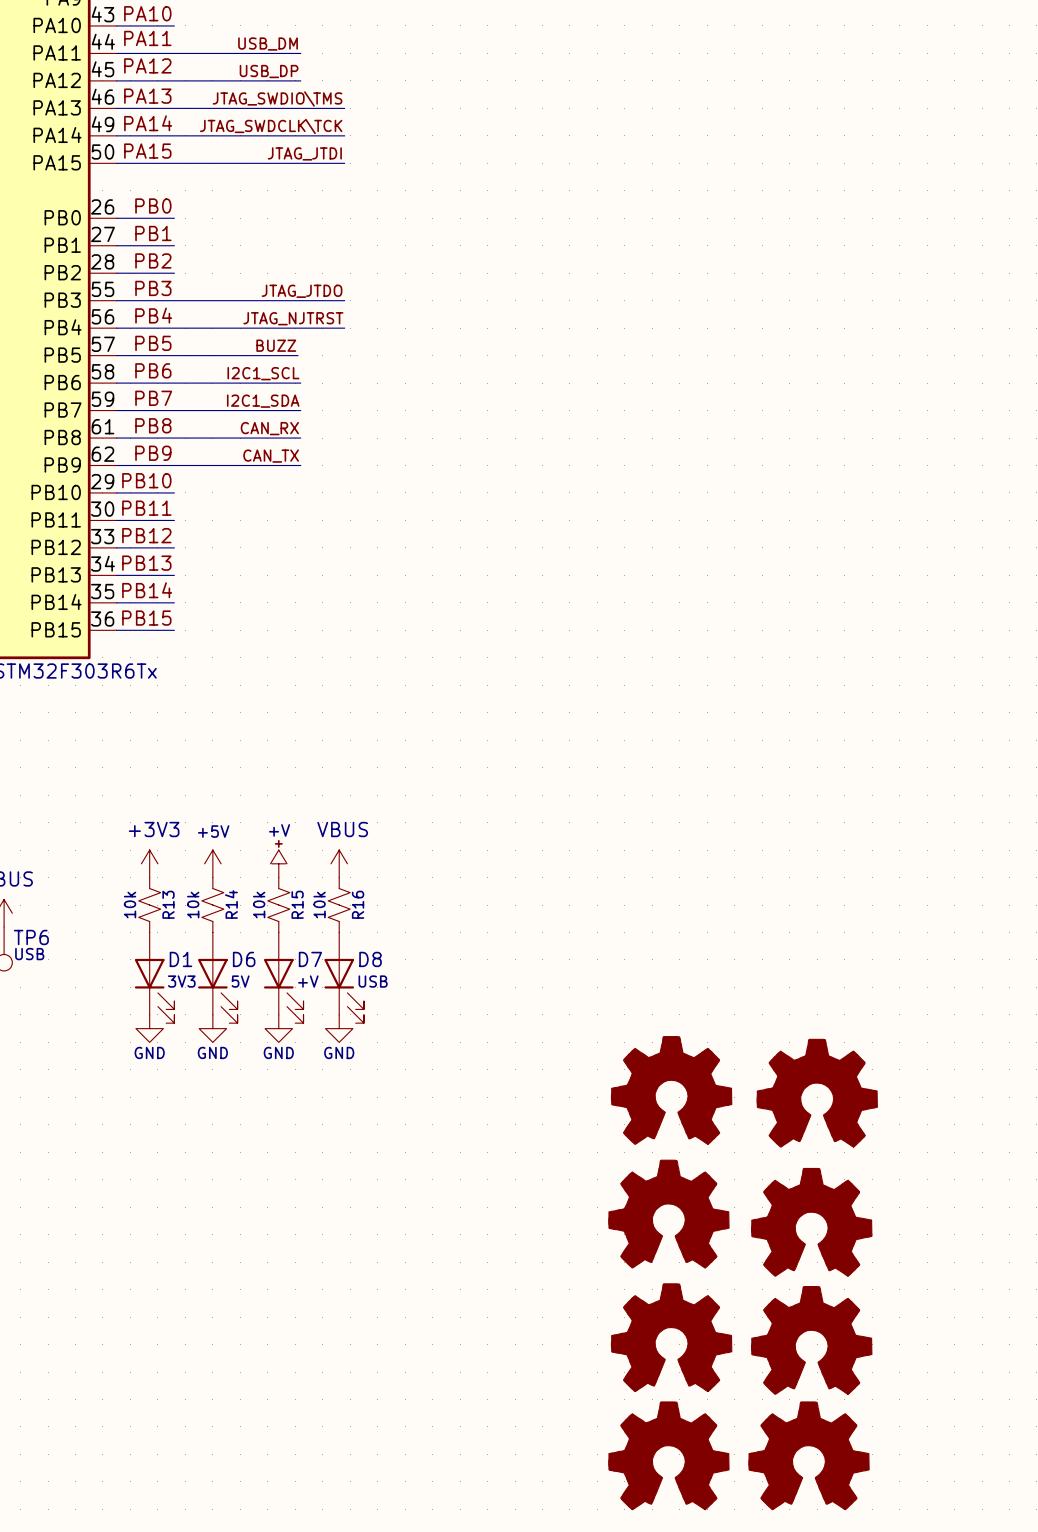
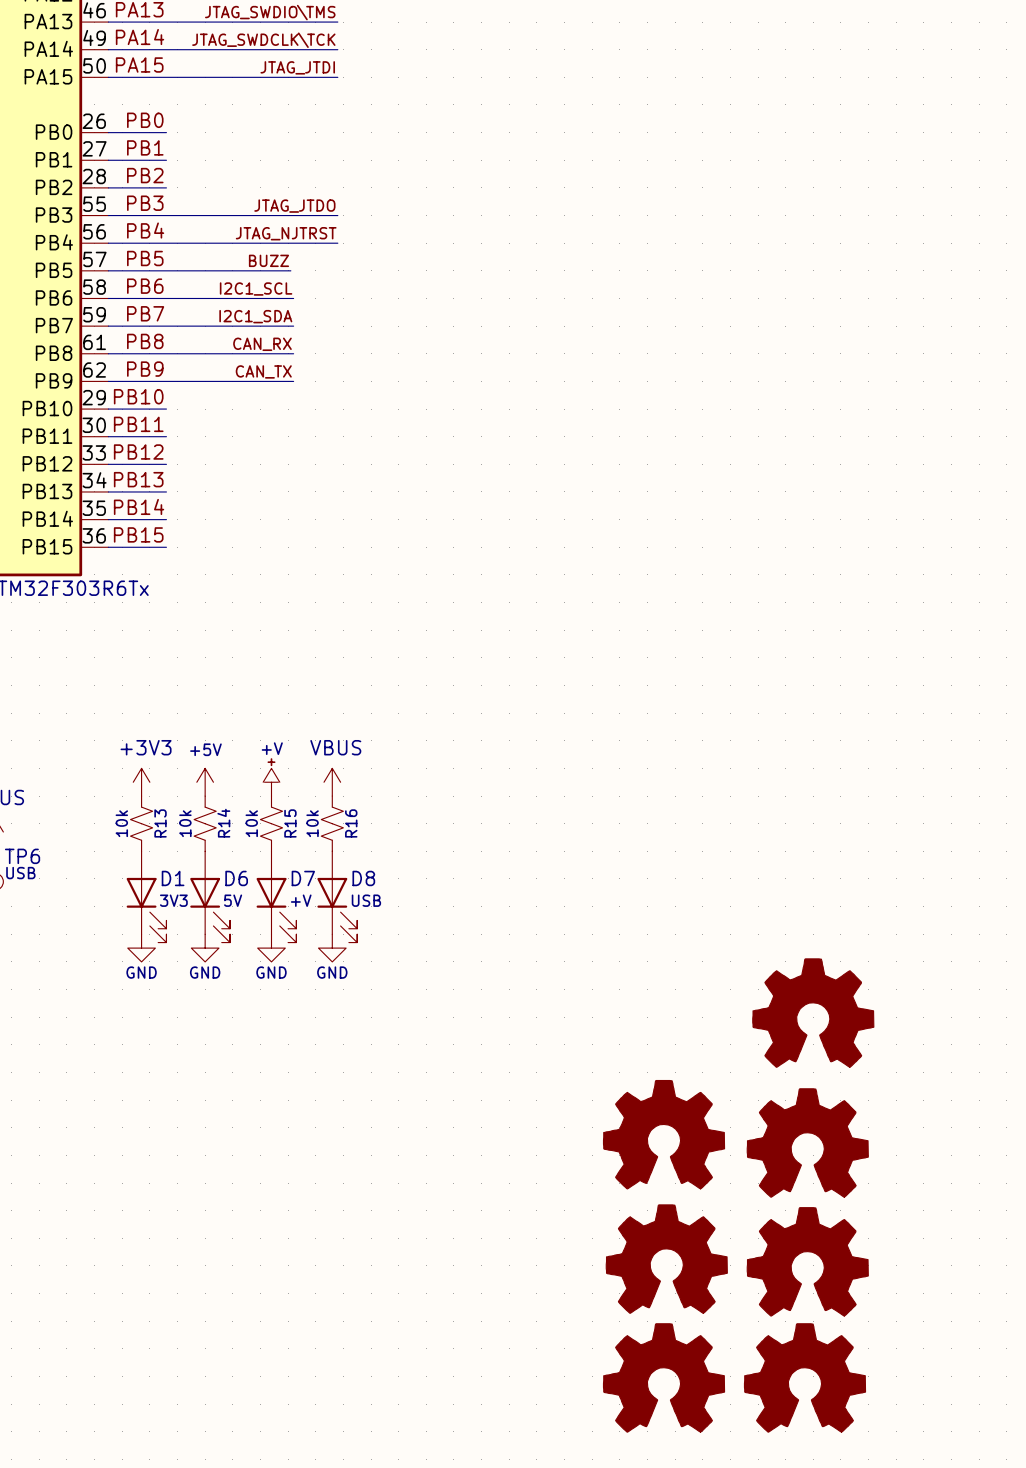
part: (671, 1090) -> none

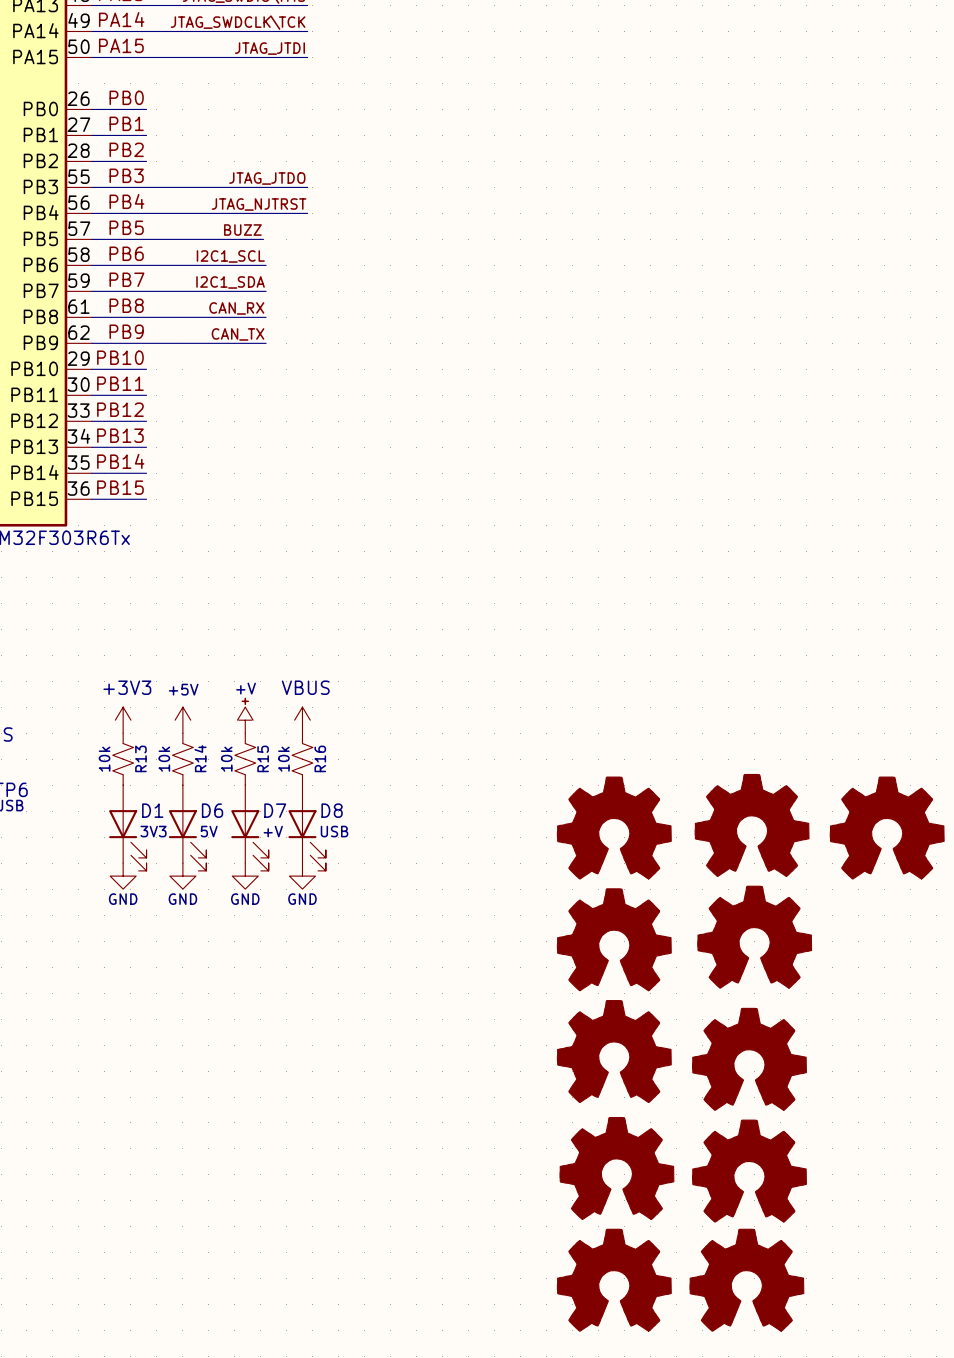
part: none -> (752, 825)
part: none -> (614, 828)
part: none -> (887, 828)
part: none -> (614, 939)

